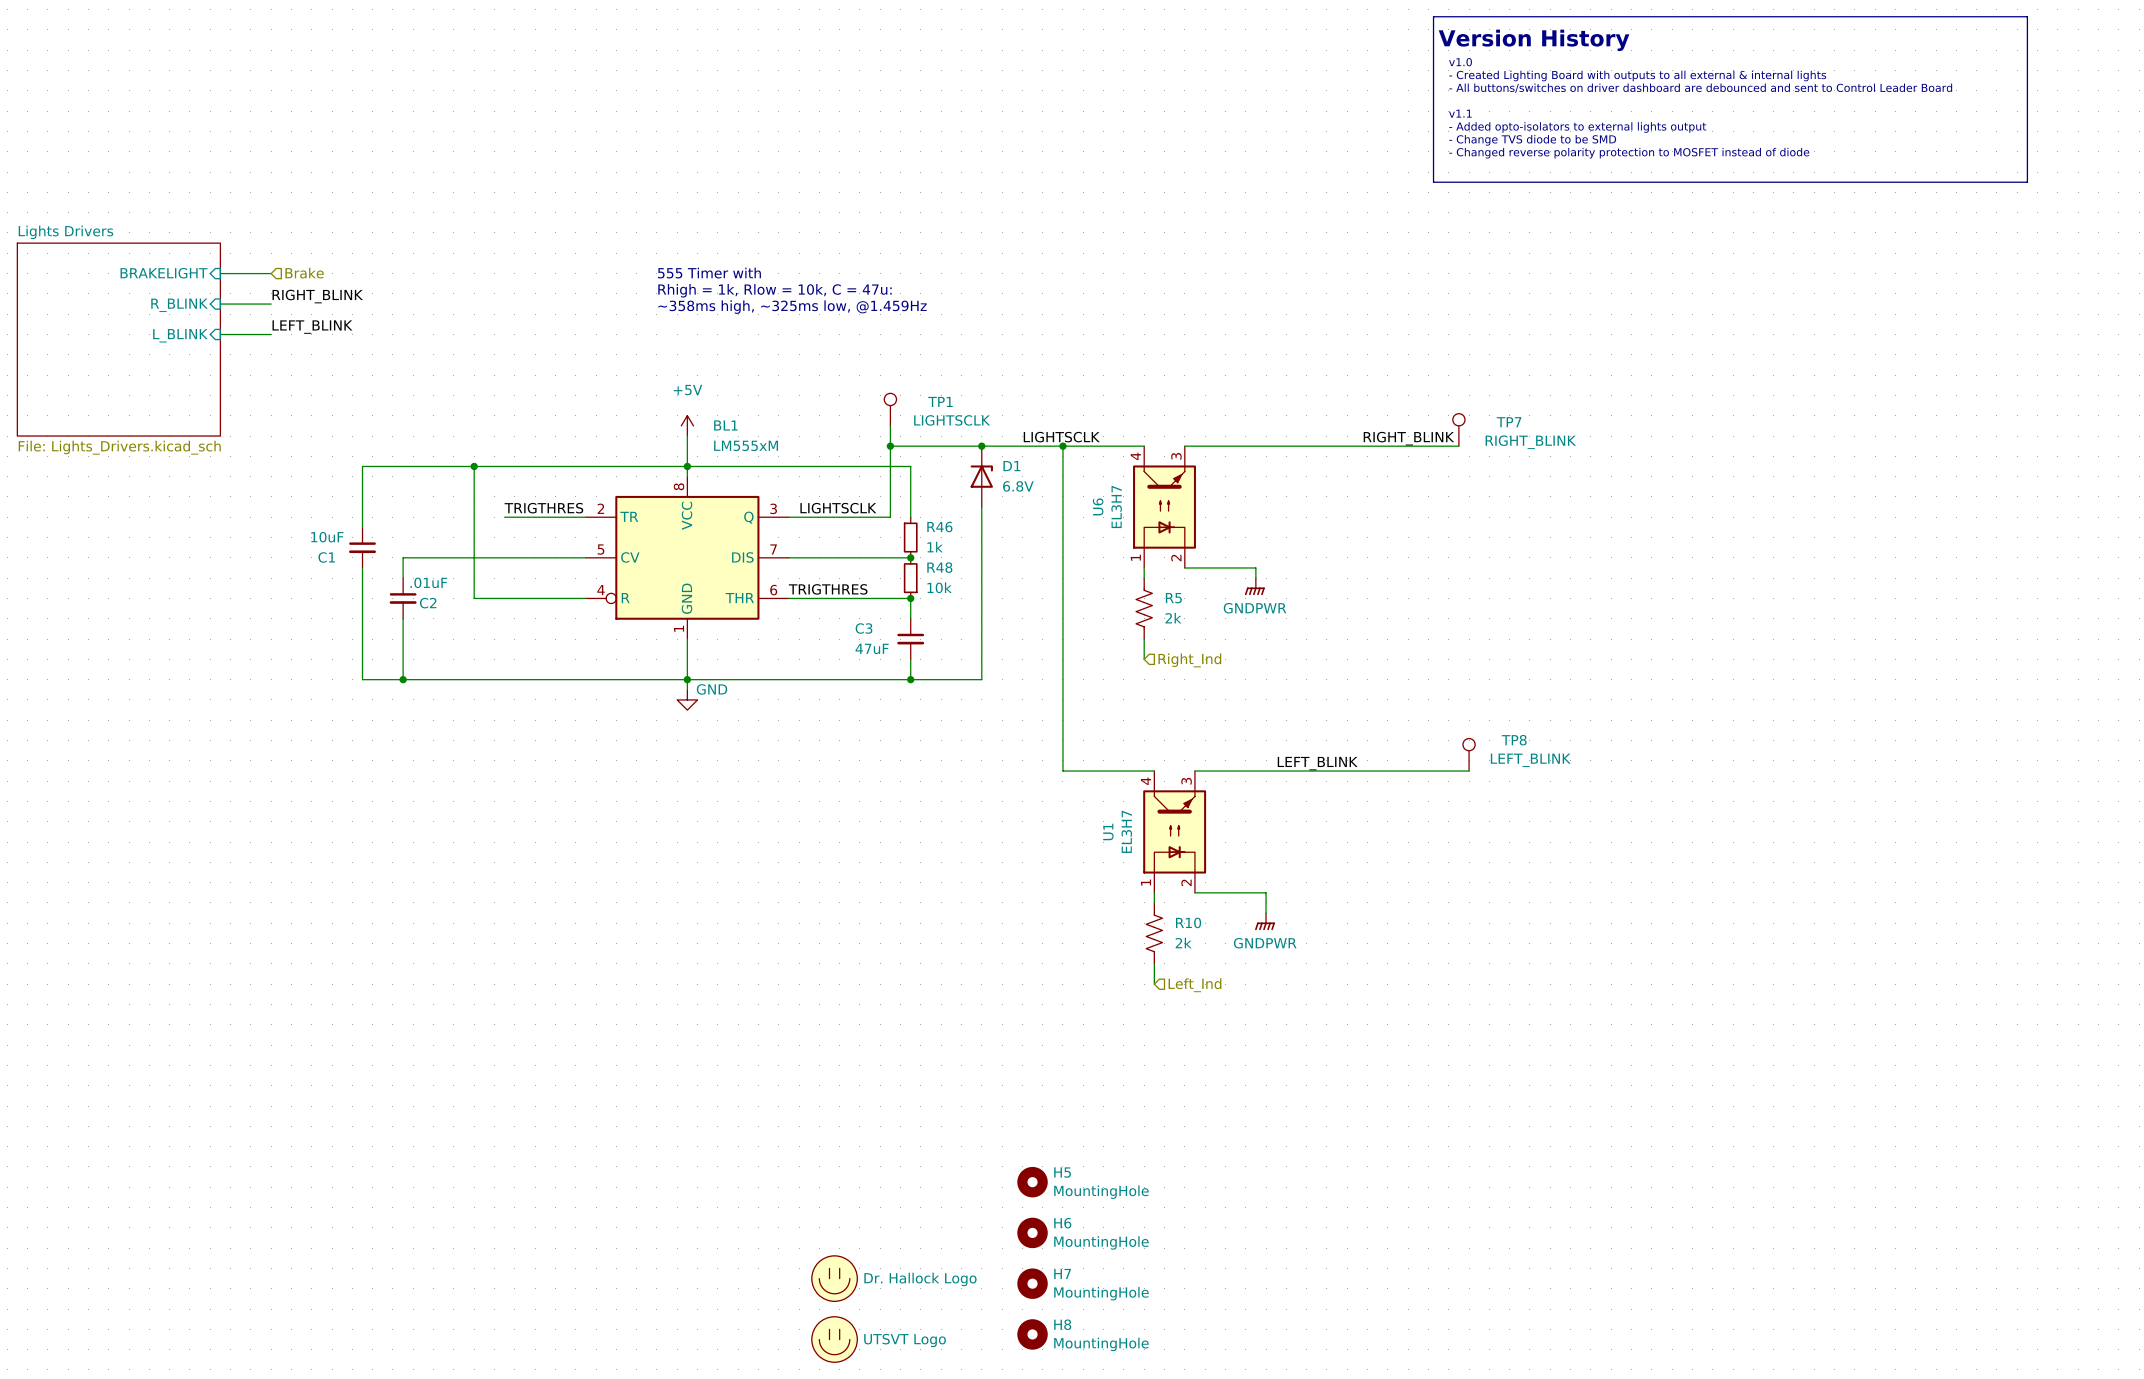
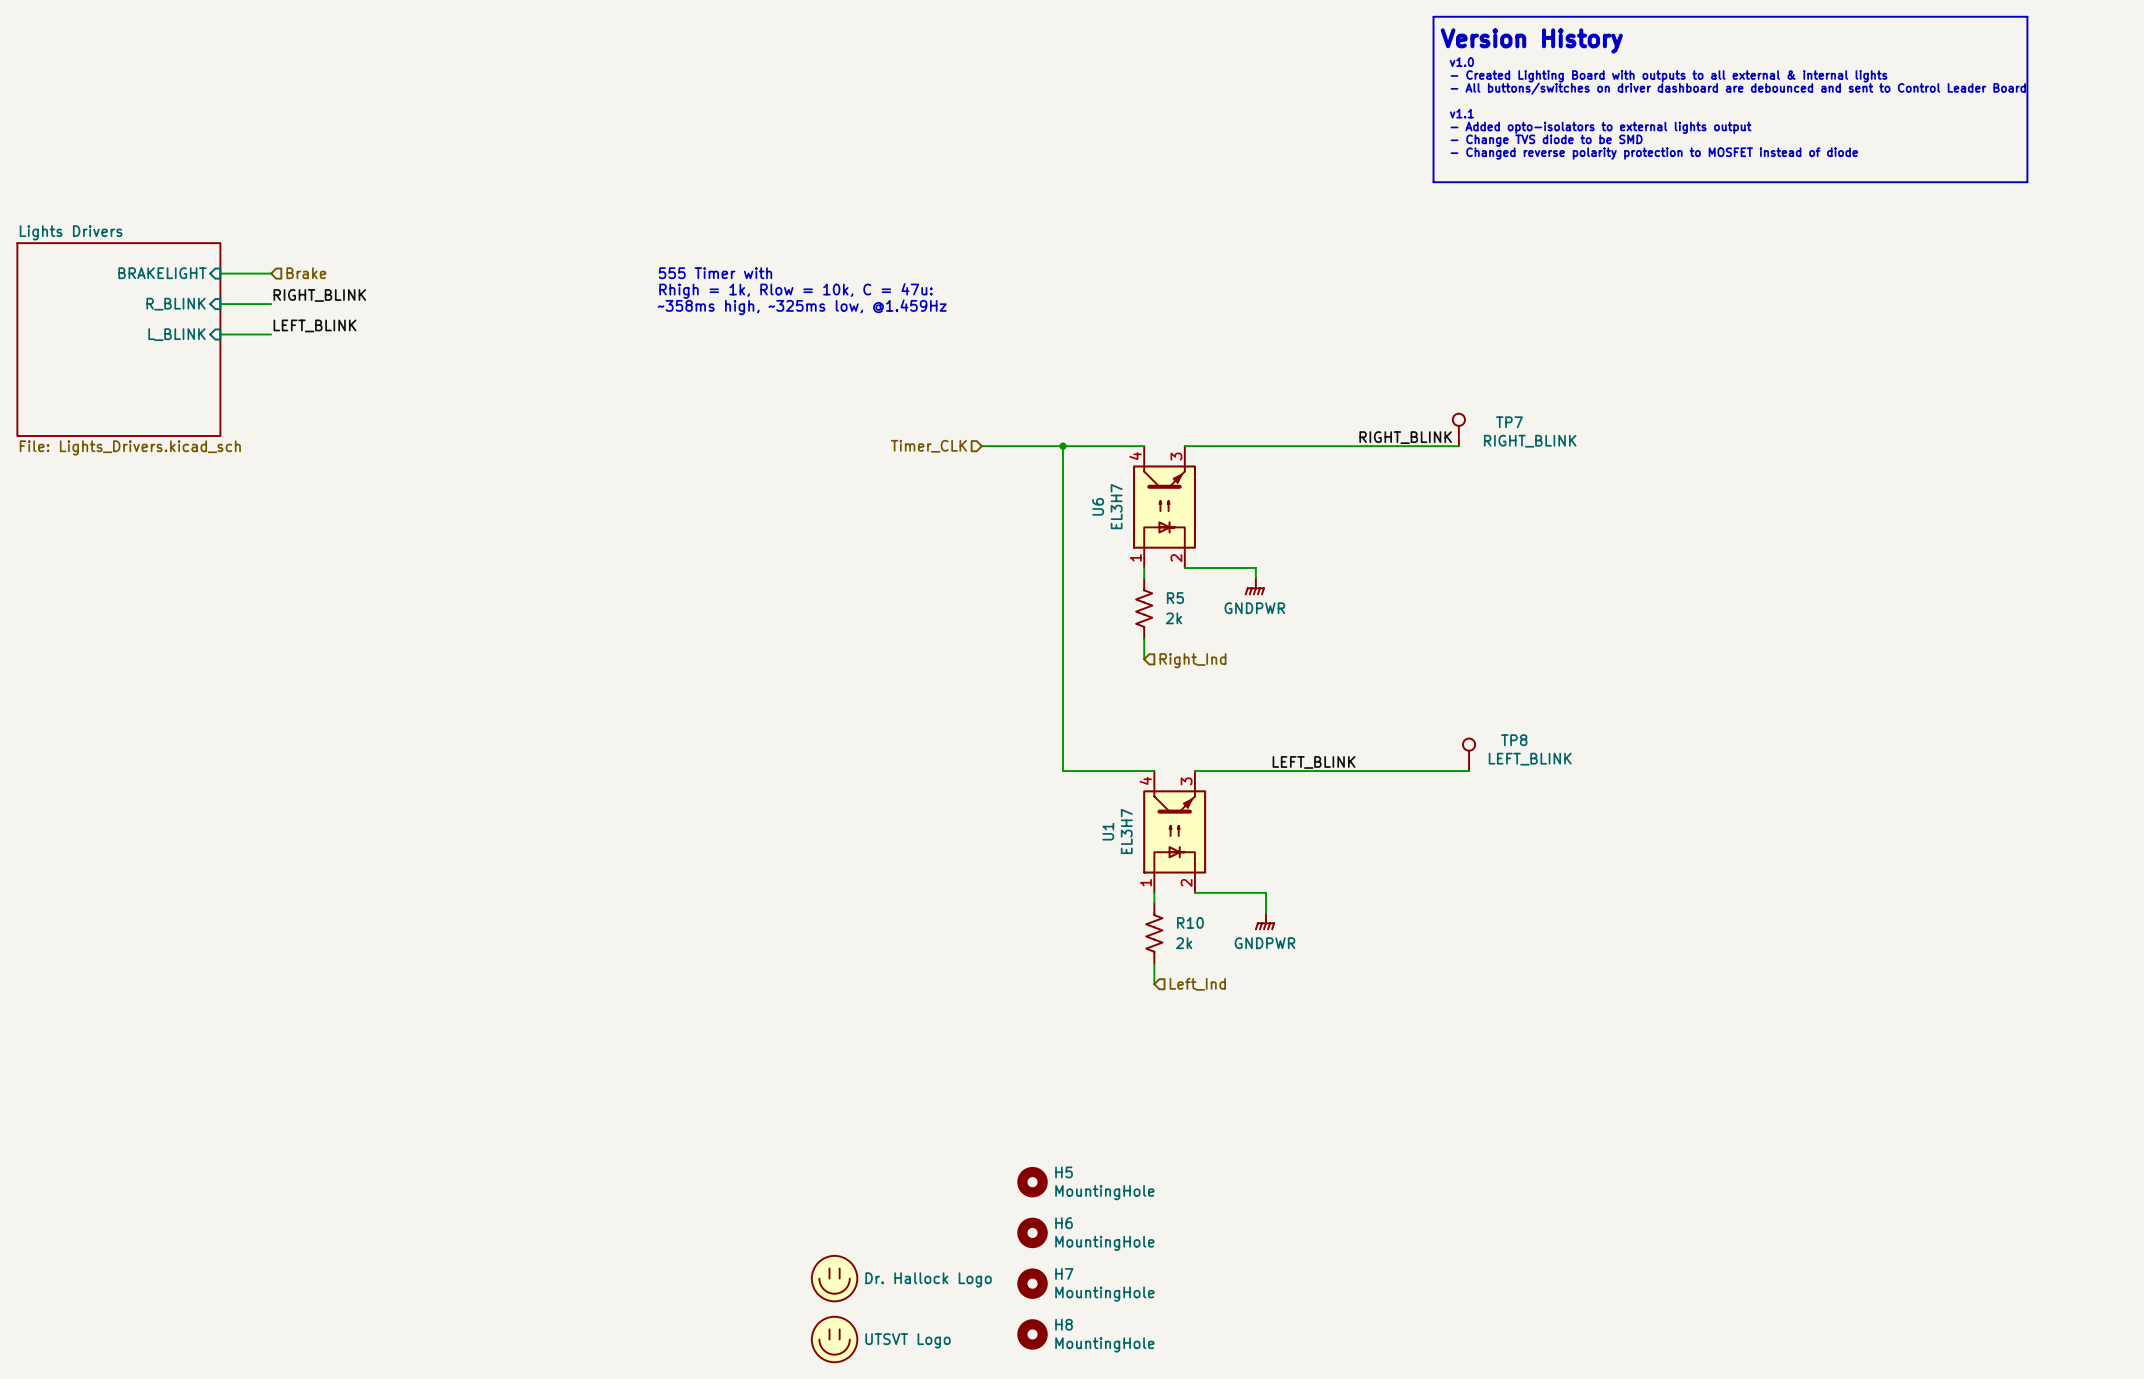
TP1: LIGHTSCLK (890, 409) -> none
power symbol: +5V (687, 425) -> none
wire: (890, 425) (890, 517) (788, 517) -> none
wire: (687, 436) (687, 476) -> none
label: LIGHTSCLK (1061, 437) -> none
wire: (890, 446) (981, 446) -> none
junction: (890, 446) -> none
junction: (981, 446) -> none
hierarchical label: none -> Timer_CLK (928, 446)
wire: (474, 466) (474, 598) (585, 598) -> none
junction: (474, 466) -> none
junction: (687, 466) -> none
D1: 6.8V (981, 476) -> none
wire: (981, 507) (981, 679) (362, 679) (362, 567) -> none
label: TRIGTHRES (543, 508) -> none
label: LIGHTSCLK (838, 508) -> none
wire: (504, 517) (585, 517) -> none
wire: (910, 517) (910, 466) (362, 466) (362, 527) -> none
R46: 1k (910, 537) -> none
C1: 10uF (362, 547) -> none
wire: (585, 557) (403, 557) (403, 578) -> none
BL1: LM555xM (687, 557) -> none
wire: (788, 557) (910, 557) -> none
junction: (910, 557) -> none
R48: 10k (910, 578) -> none
label: TRIGTHRES (828, 589) -> none
C2: .01uF (403, 598) -> none
wire: (788, 598) (910, 598) (910, 618) -> none
junction: (910, 598) -> none
wire: (403, 618) (403, 679) -> none
wire: (687, 639) (687, 689) -> none
C3: 47uF (910, 639) -> none
wire: (910, 659) (910, 679) -> none
junction: (403, 679) -> none
junction: (687, 679) -> none
junction: (910, 679) -> none
power symbol: GND (687, 699) -> none

